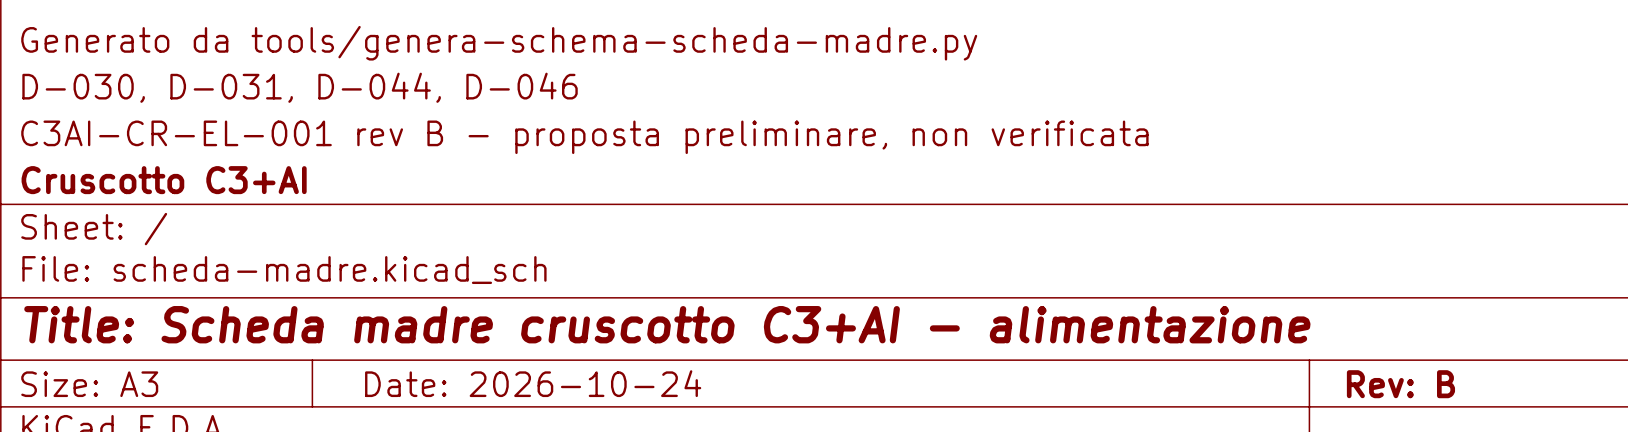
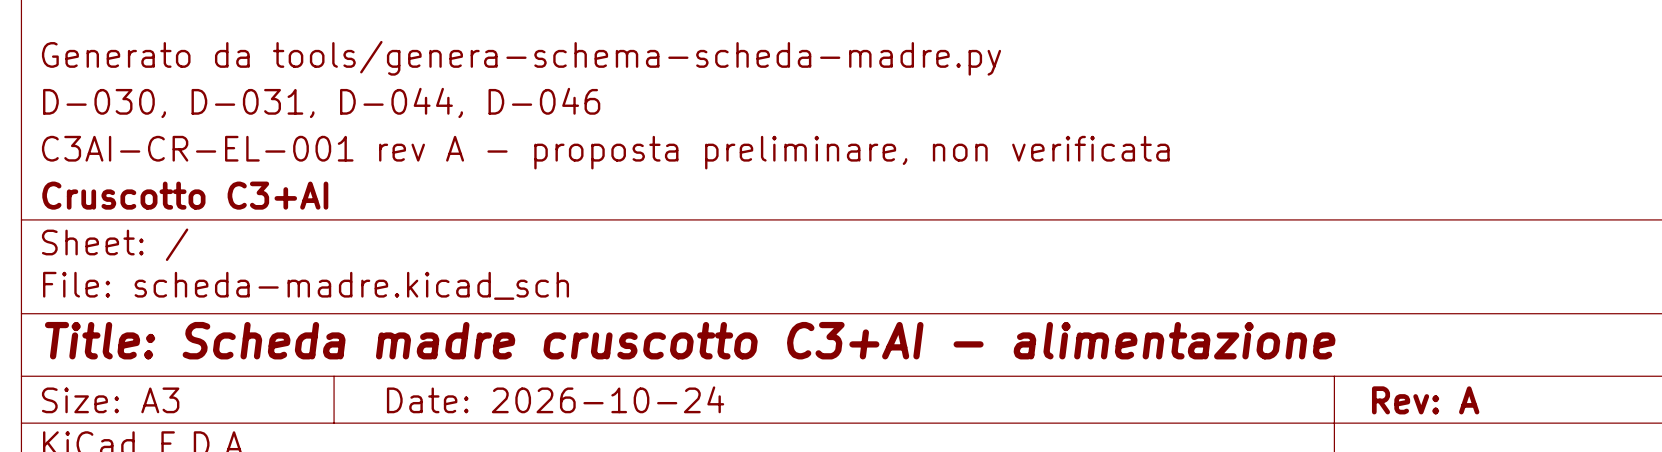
title block: C3AI-CR-EL-001 rev B - proposta preliminare, non verificata (584, 137) -> C3AI-CR-EL-001 rev A - proposta preliminare, non verificata (605, 152)
title block: Rev: B (1400, 384) -> Rev: A (1425, 400)

